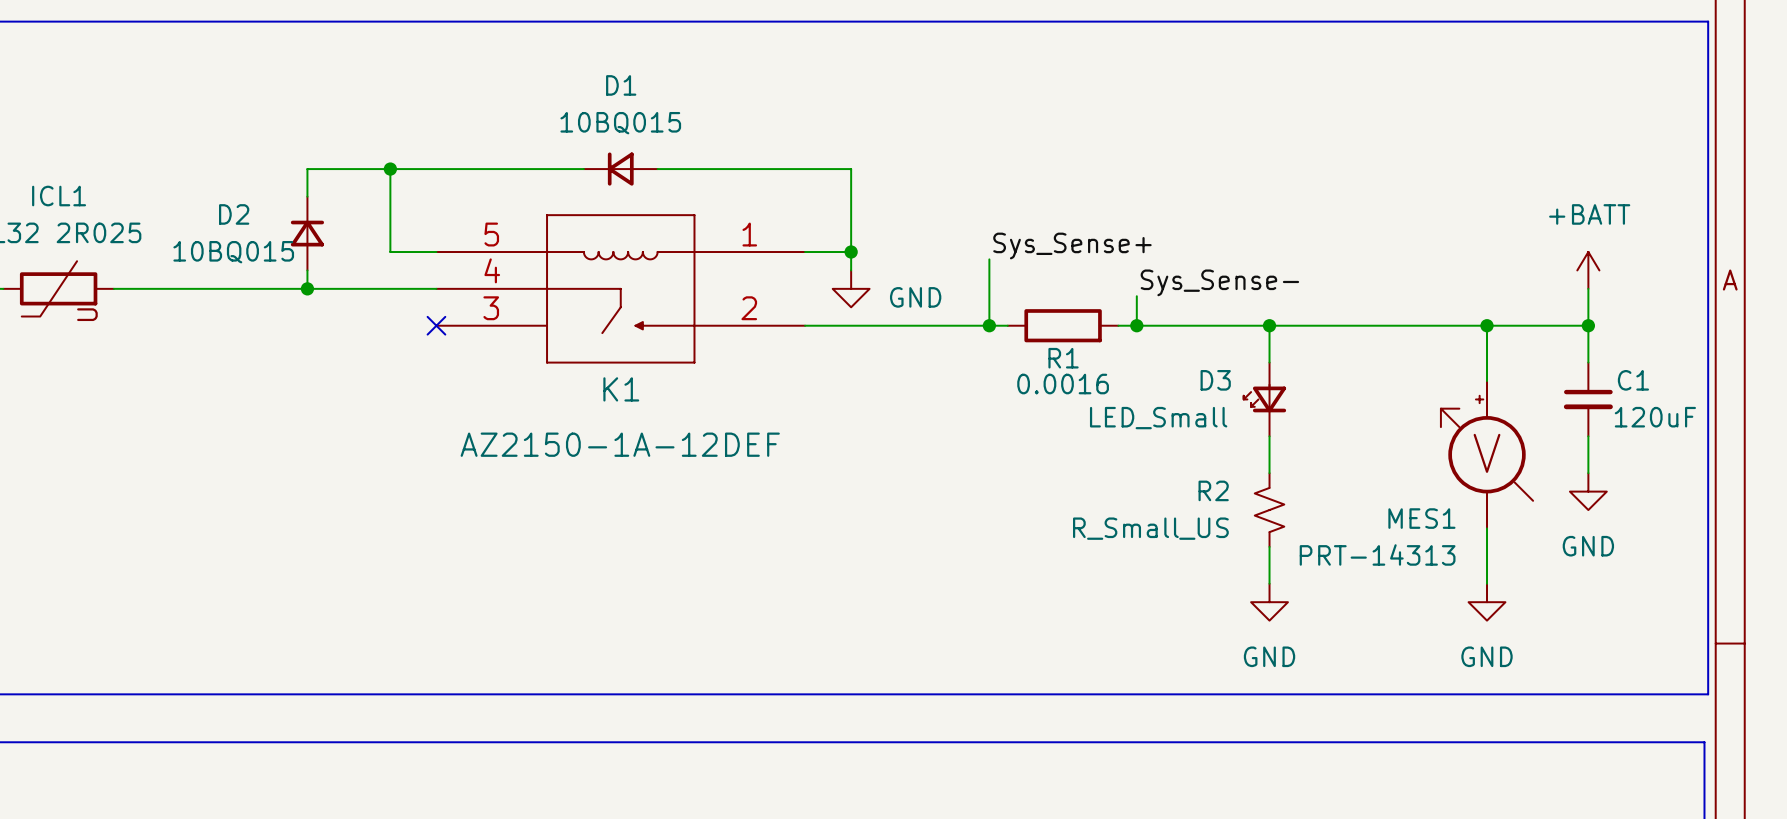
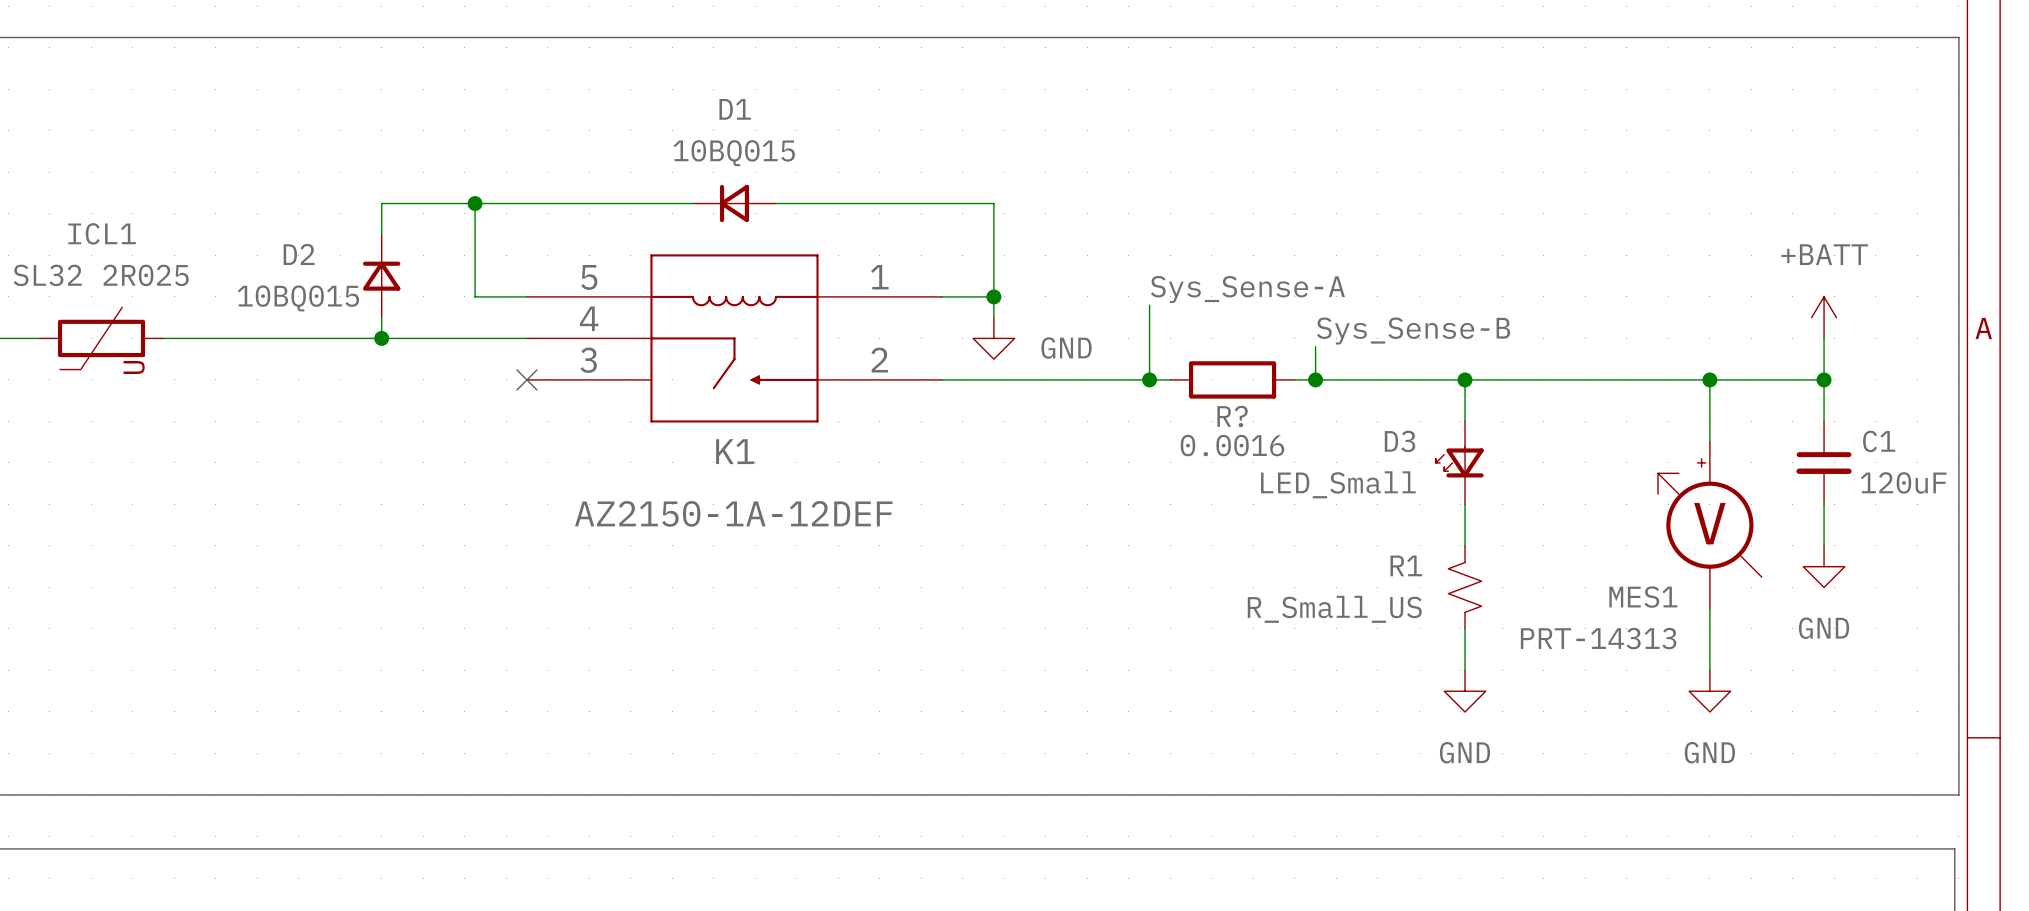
label: Sys_Sense+ (1072, 246) -> Sys_Sense-A (1247, 289)
label: Sys_Sense- (1219, 282) -> Sys_Sense-B (1413, 331)
R1 name: R1 (1063, 358) -> R? (1232, 416)
R2 name: R2 (1213, 490) -> R1 (1406, 565)

